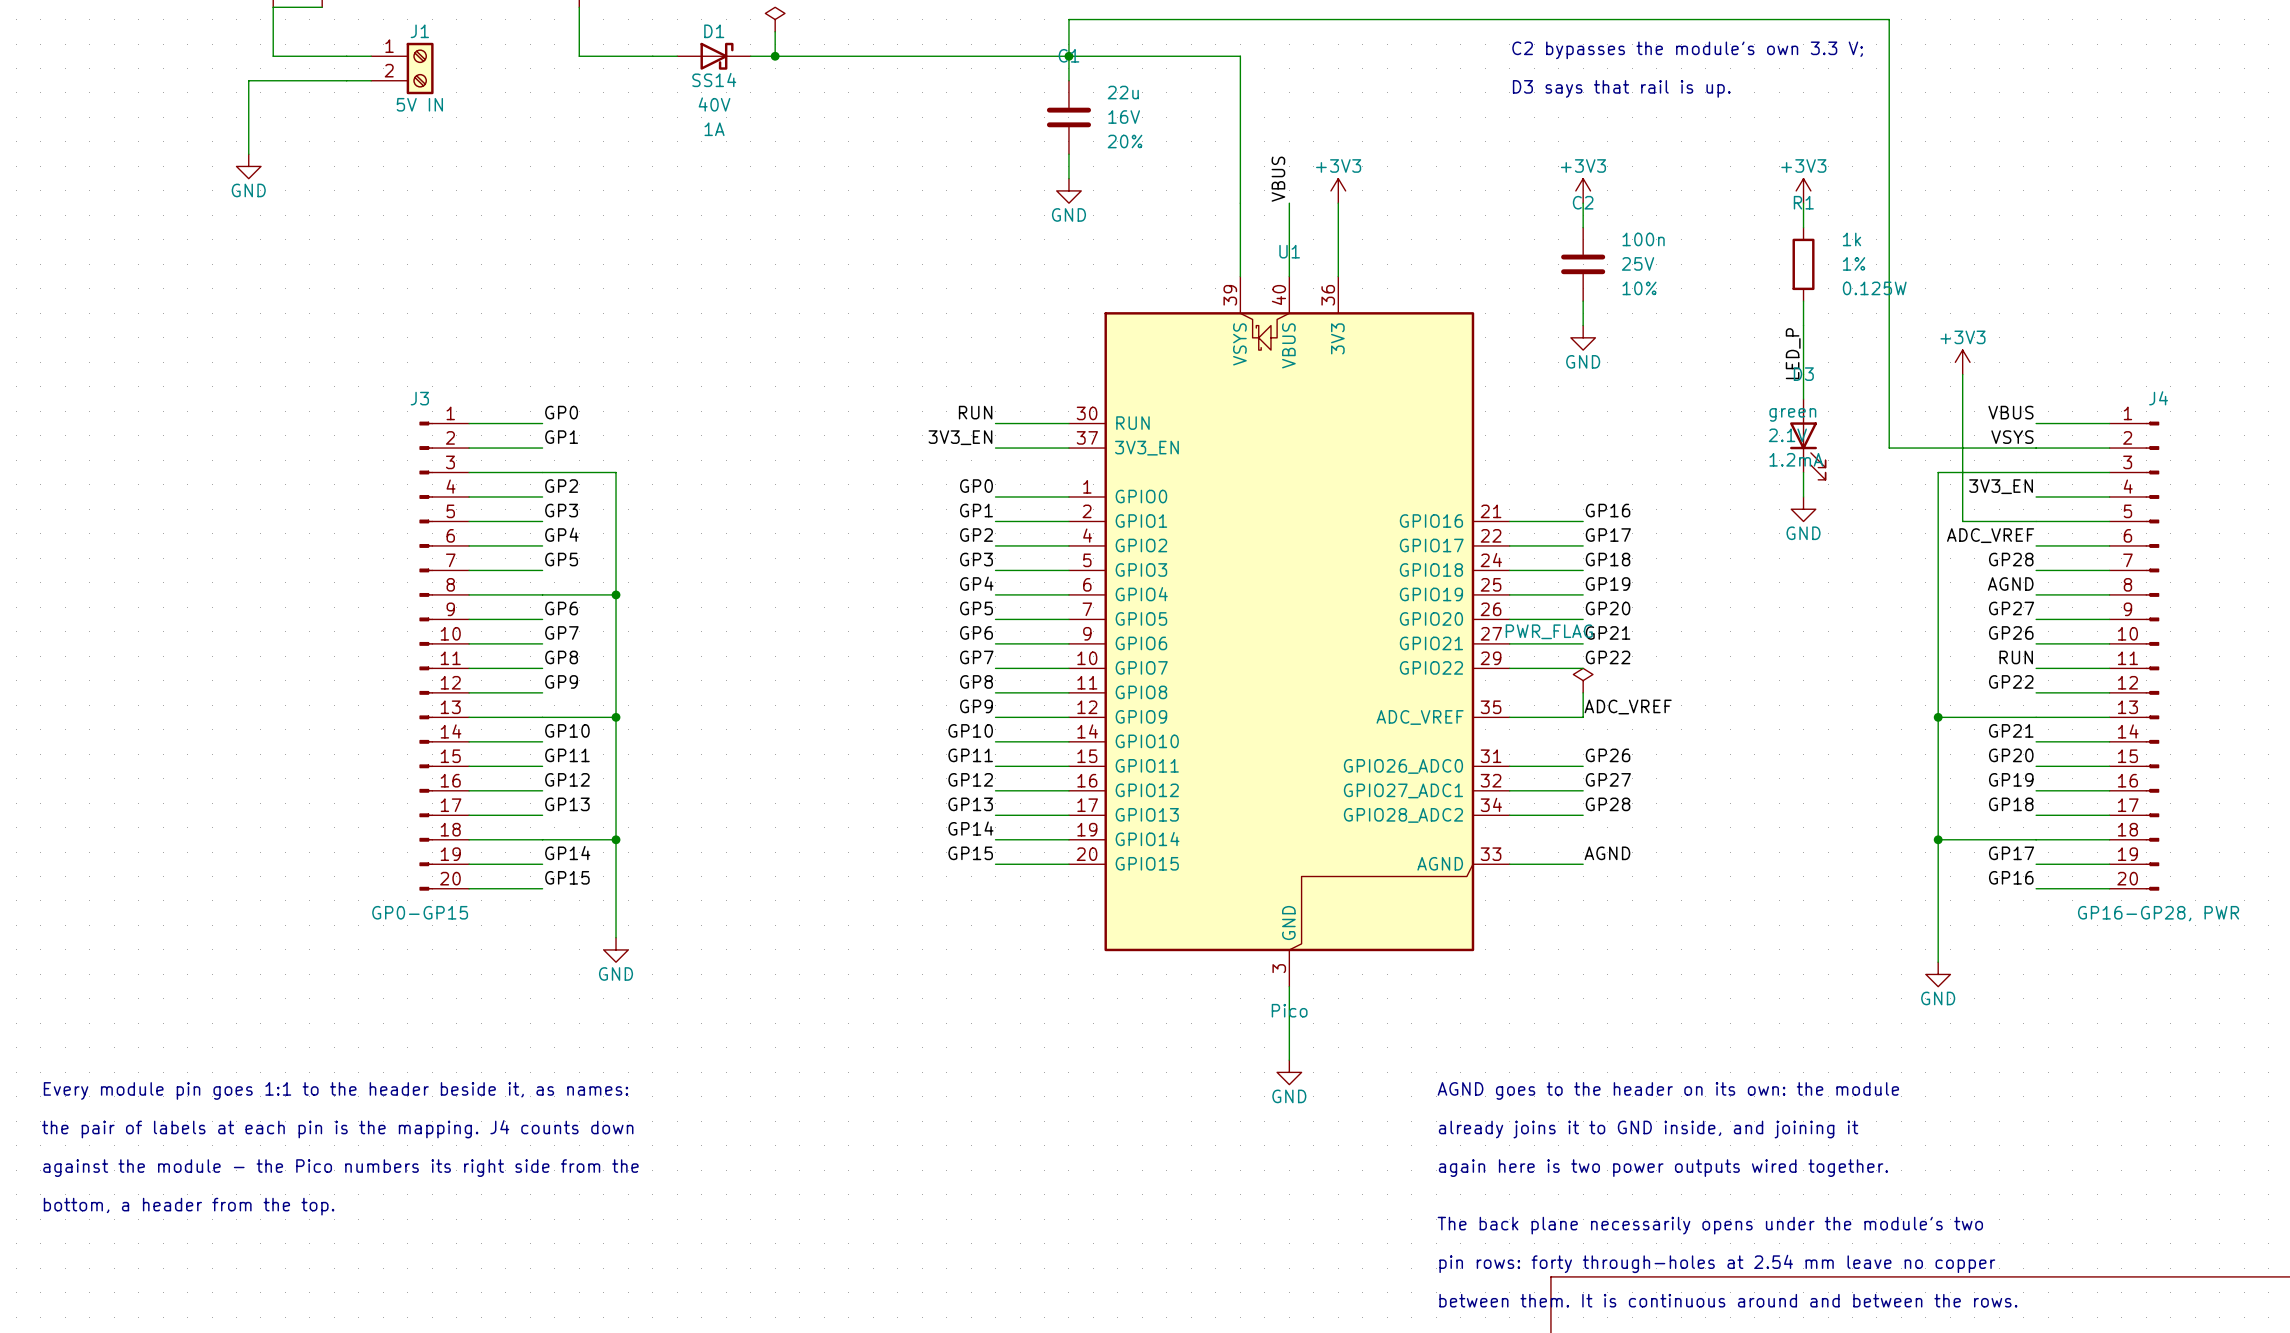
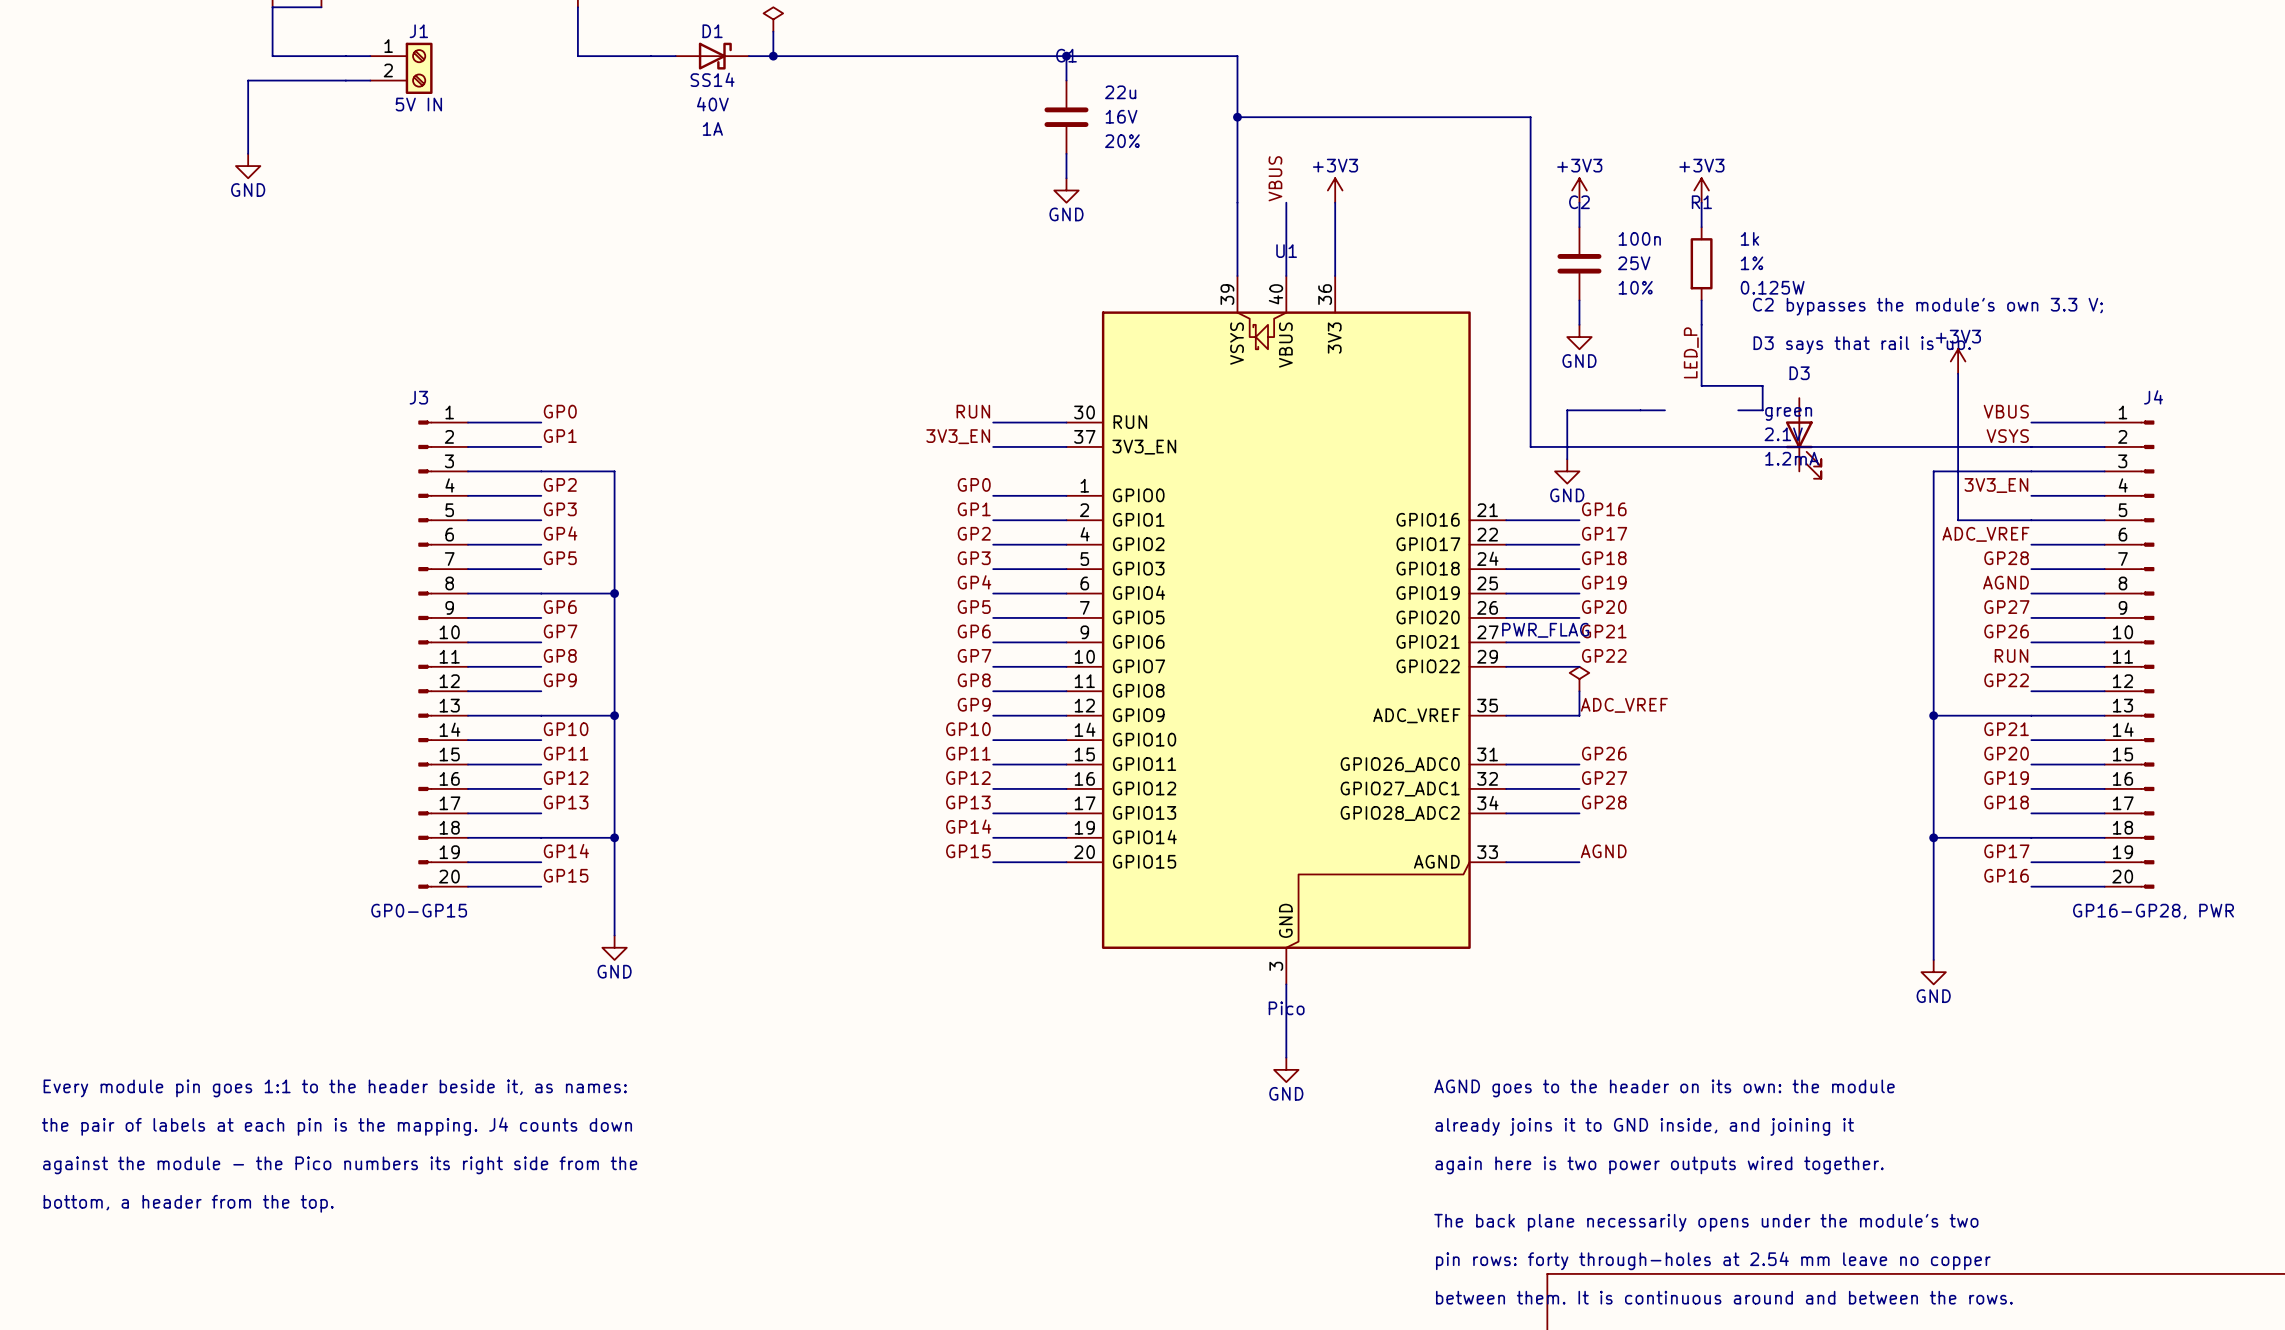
text: C2 bypasses the module's own 3.3 V; (1687, 50) -> none
wire: (1068, 56) (1068, 19) (1889, 19) (1889, 448) -> (1237, 117) (1530, 117) (1530, 446) (1884, 446)
text: D3 says that rail is up. (1621, 88) -> none
junction: none -> (1237, 117)
power symbol position: +3V3 (1803, 190) -> +3V3 (1701, 190)
wire: (1803, 203) (1803, 227) -> (1701, 202) (1701, 227)
R1 position: (1803, 264) -> (1701, 263)
wire: none -> (1701, 300) (1701, 385) (1762, 385) (1762, 410) (1738, 410)
wire: (1803, 301) (1803, 399) -> none
text: none -> C2 bypasses the module's own 3.3 V; (1927, 306)
text: none -> D3 says that rail is up. (1862, 345)
label position: LED_P (1793, 353) -> LED_P (1691, 352)
wire: none -> (1664, 410) (1567, 410) (1567, 459)
wire: (1803, 472) (1803, 496) -> none
power symbol position: GND (1803, 509) -> GND (1567, 471)

